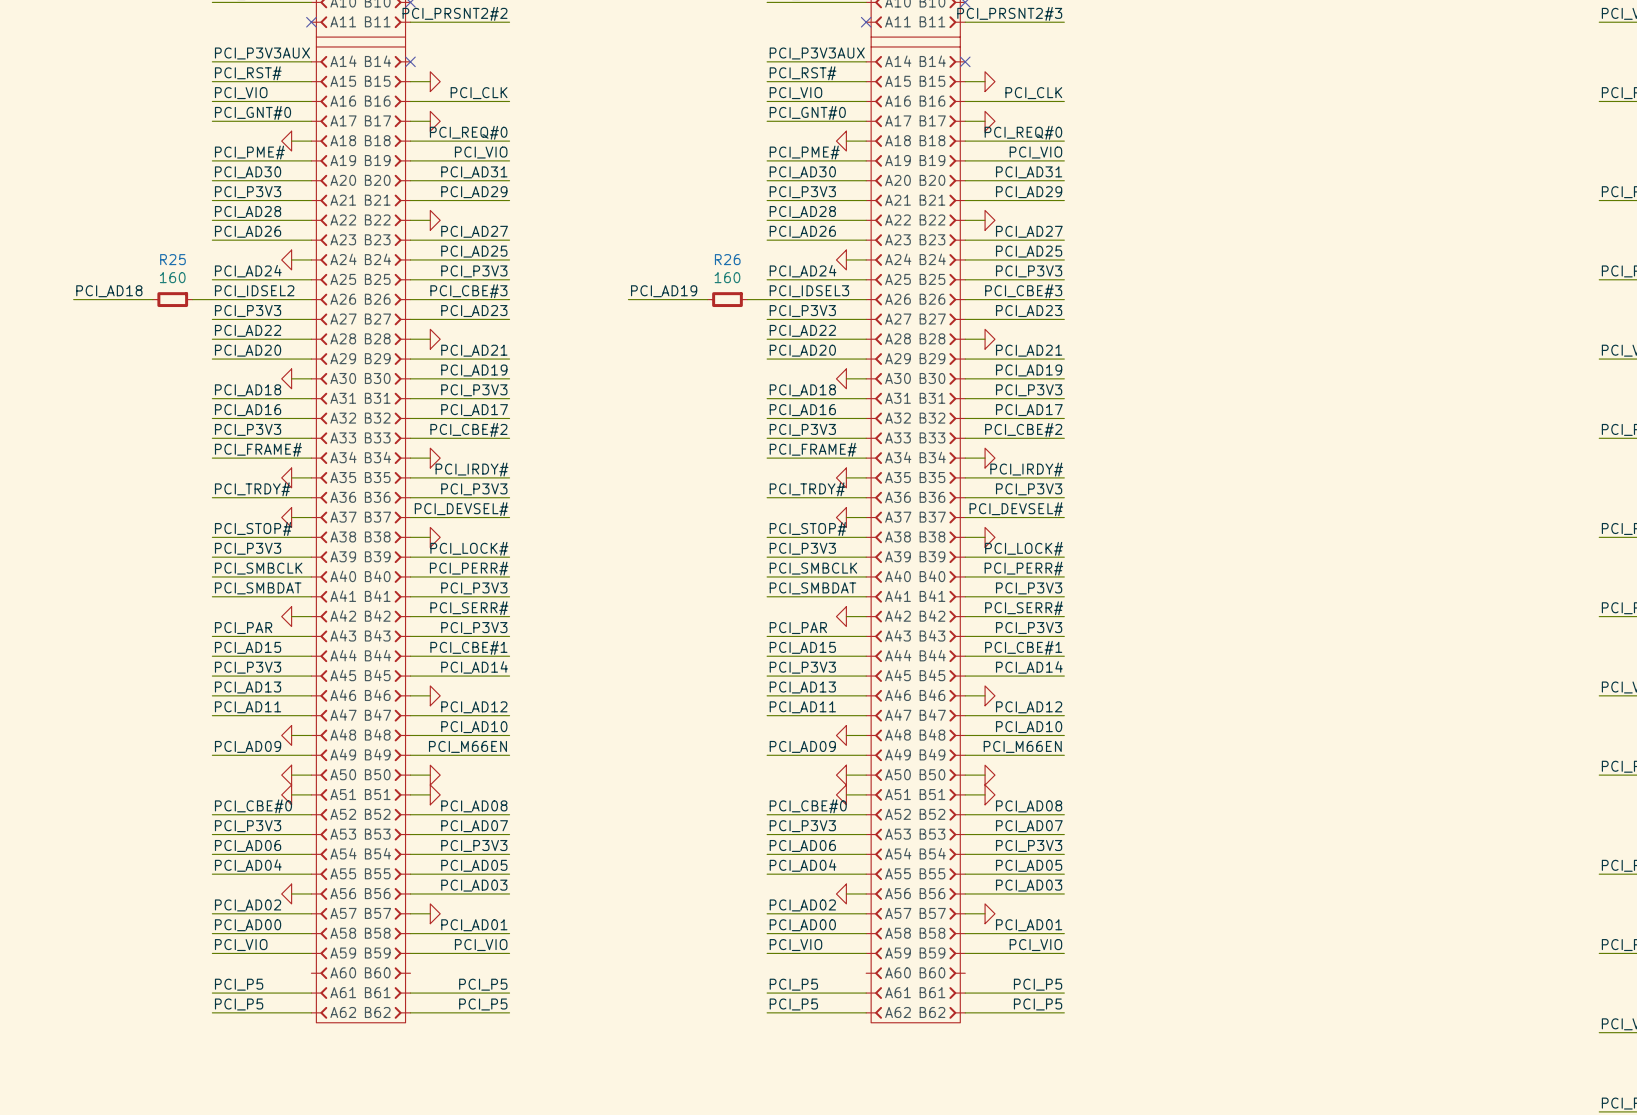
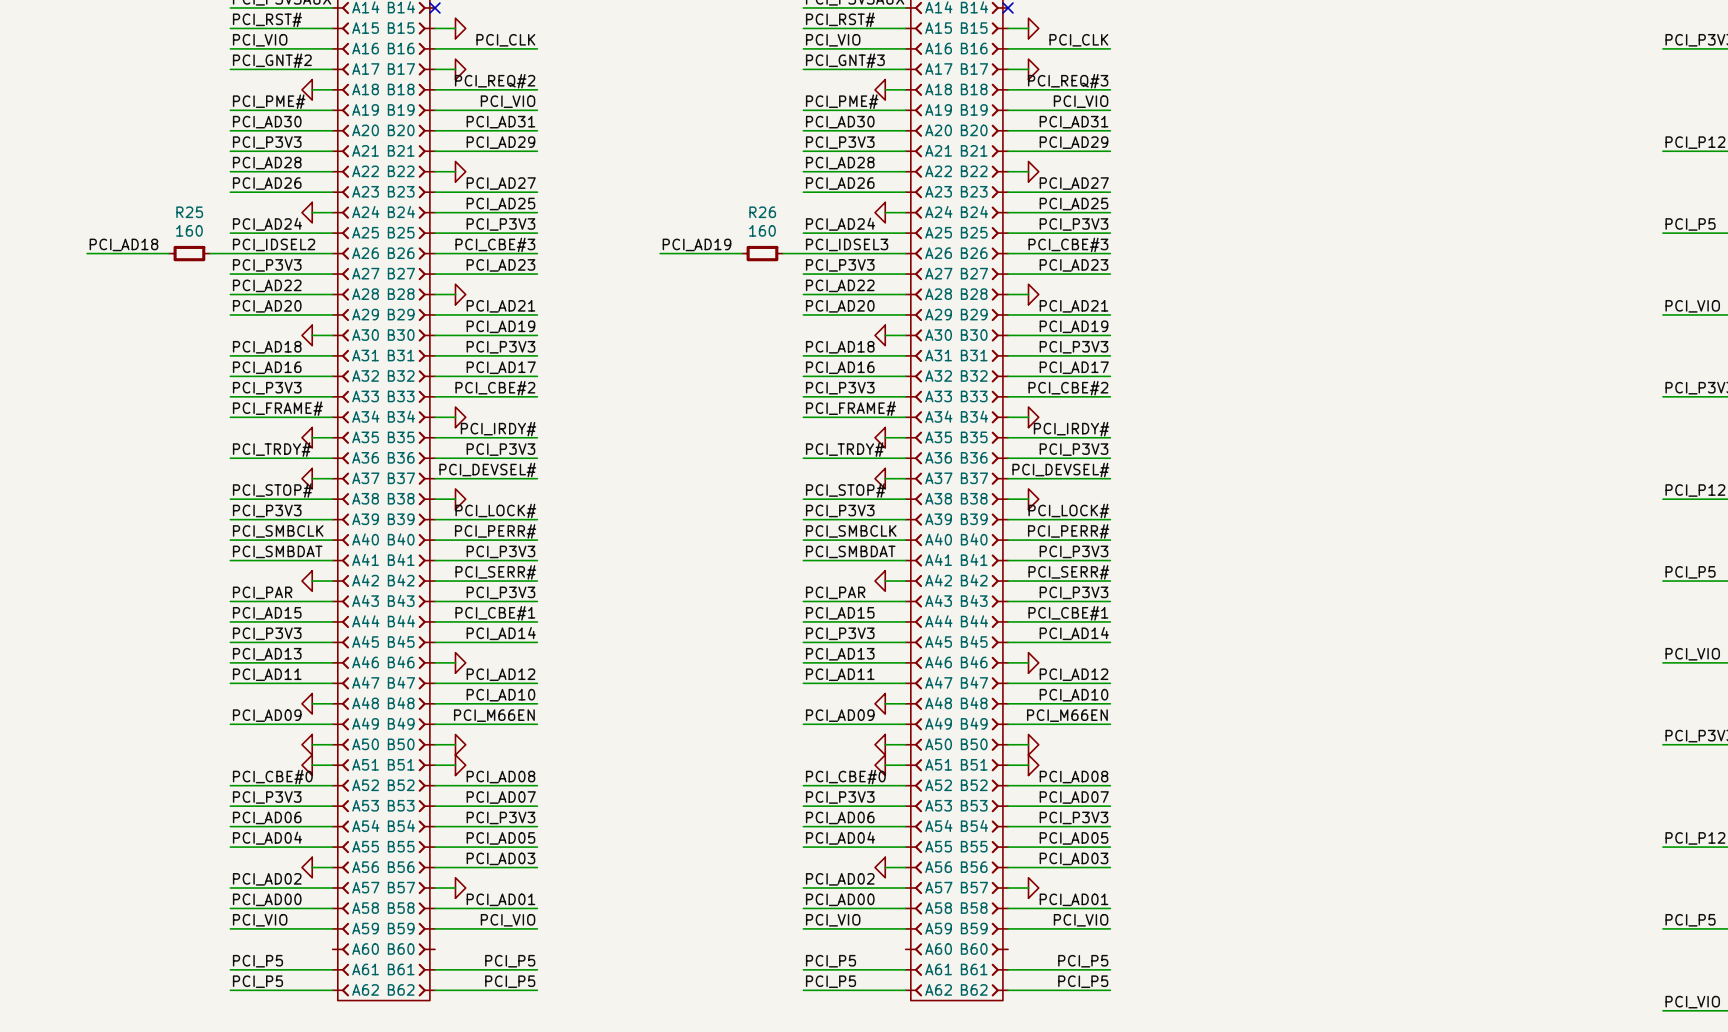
label: PCI_GNT#0 (253, 112) -> PCI_GNT#2 (272, 60)
label: PCI_GNT#0 (807, 112) -> PCI_GNT#3 (845, 60)
label: PCI_REQ#0 (468, 132) -> PCI_REQ#2 (495, 81)
label: PCI_REQ#0 (1023, 132) -> PCI_REQ#3 (1068, 81)

